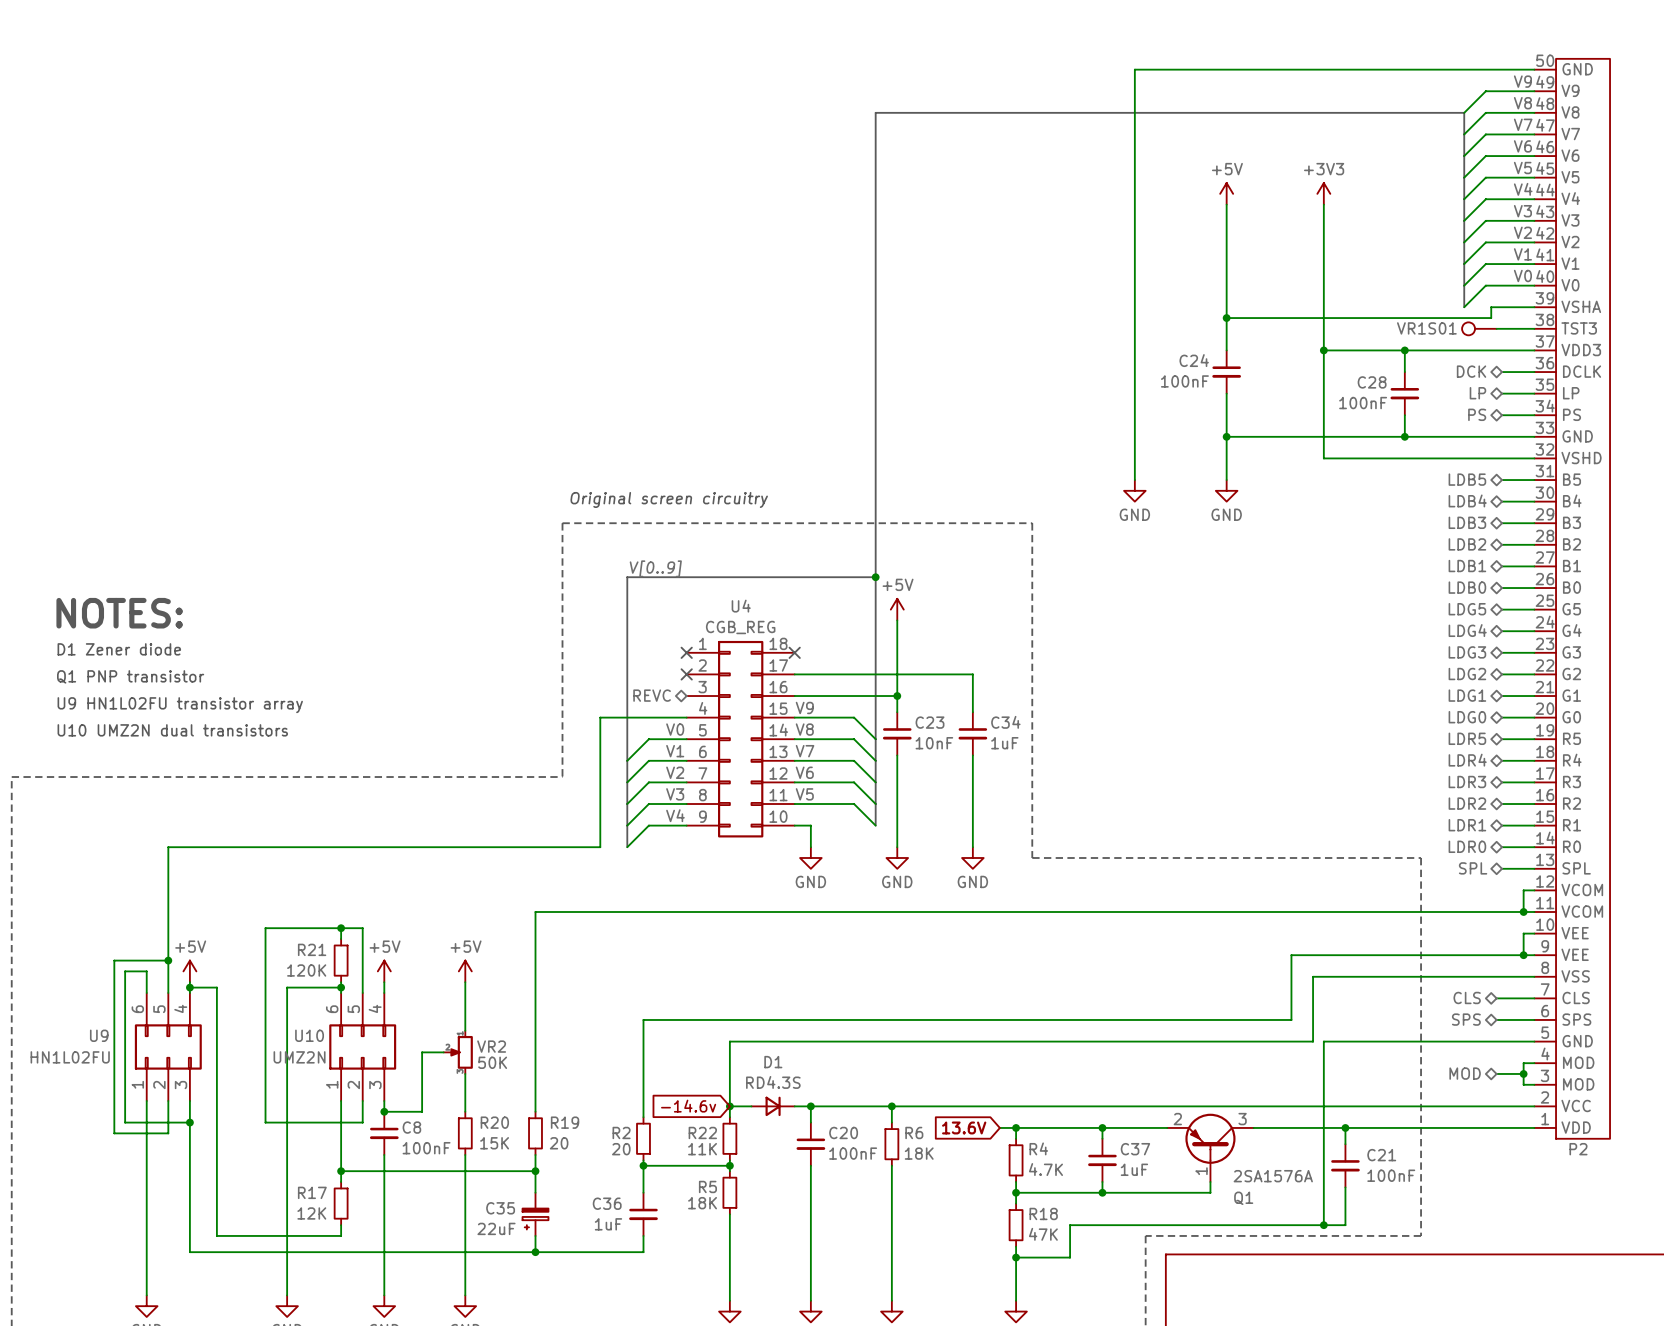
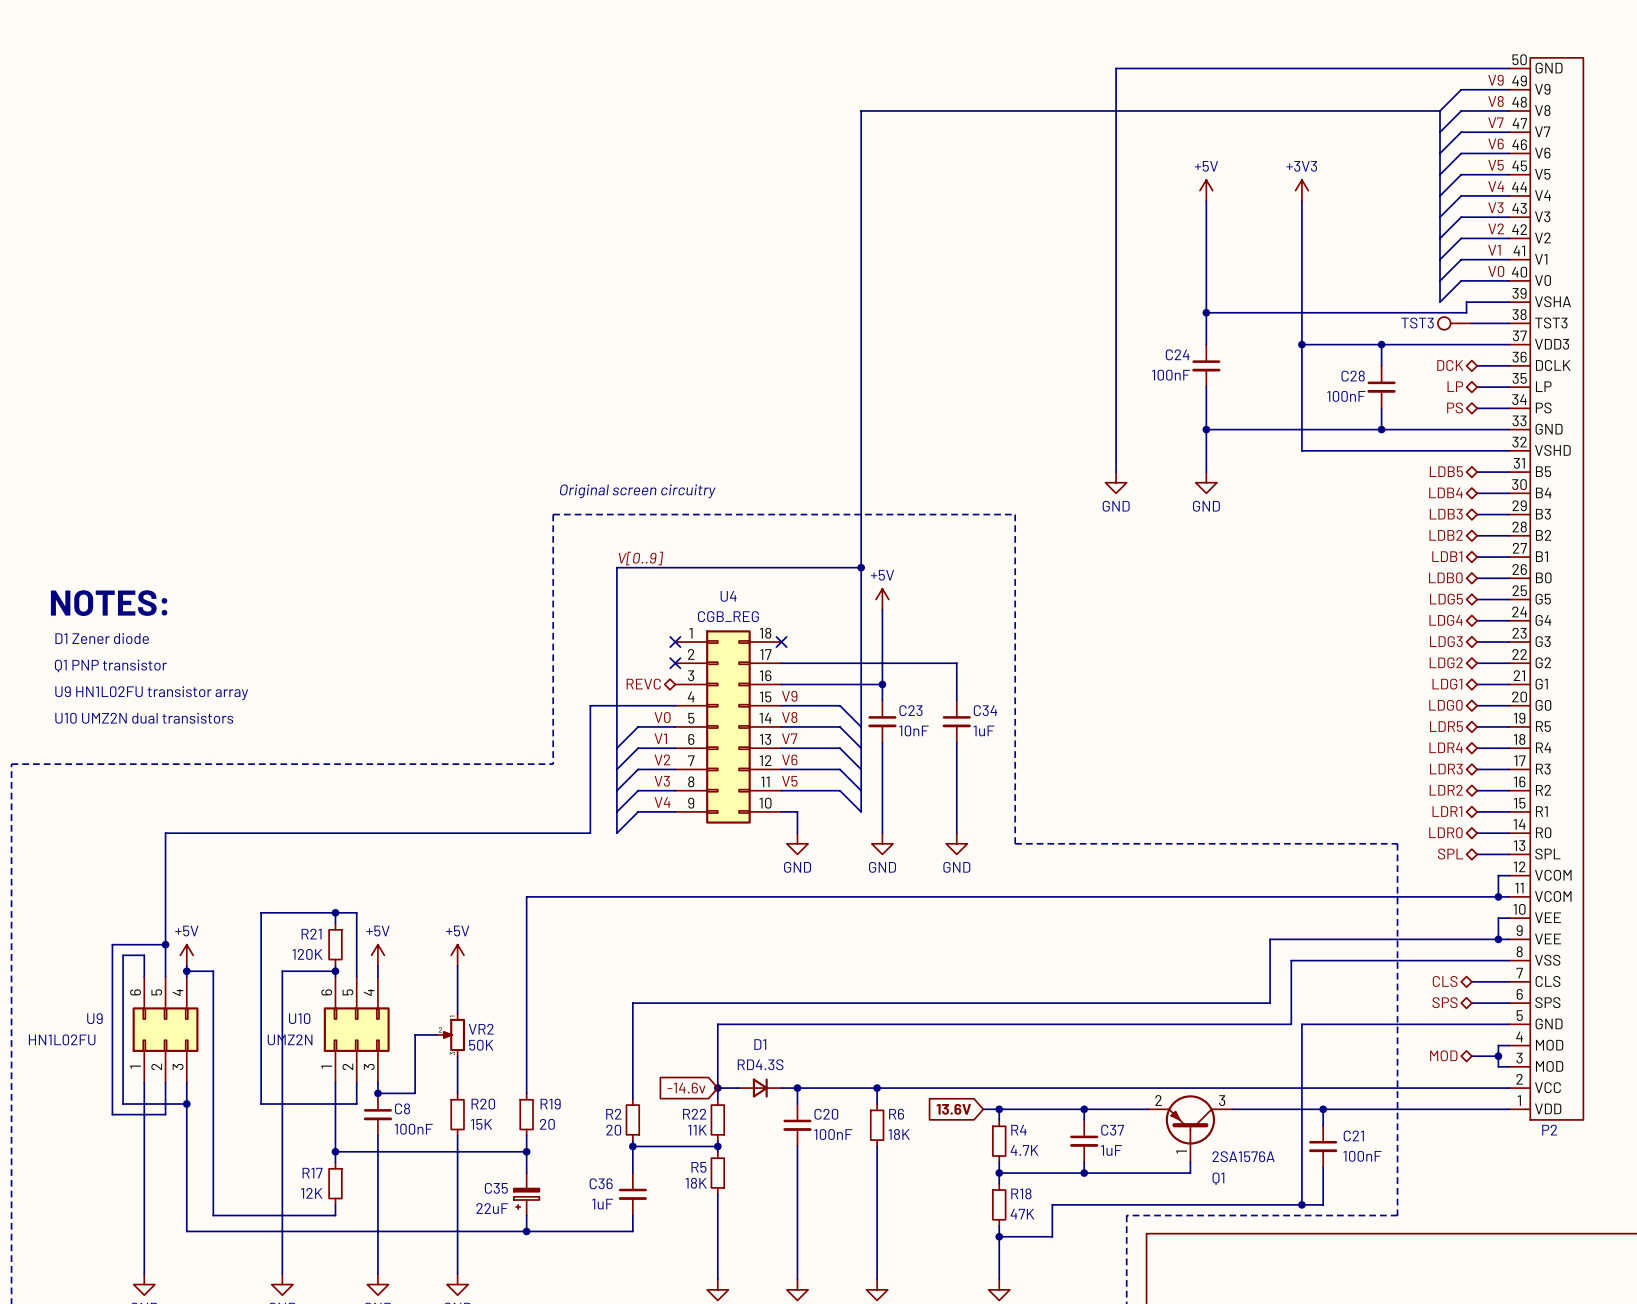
VR1S01 name: VR1S01 (1426, 328) -> TST3 (1417, 322)

